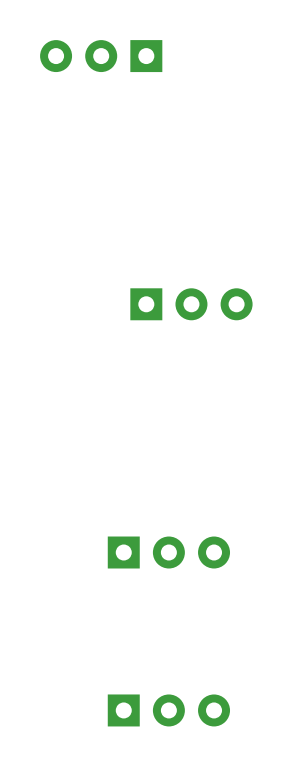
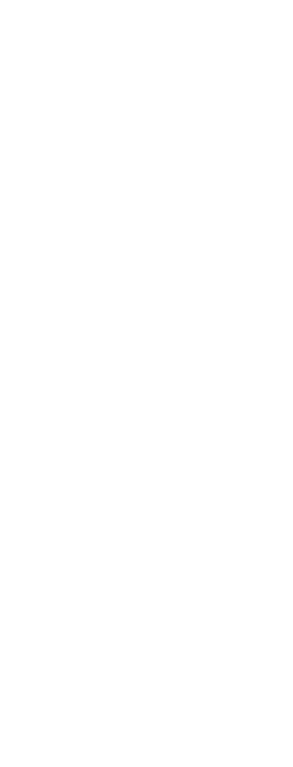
part: (101, 56) -> none
part: (191, 304) -> none
part: (168, 552) -> none
part: (168, 710) -> none

